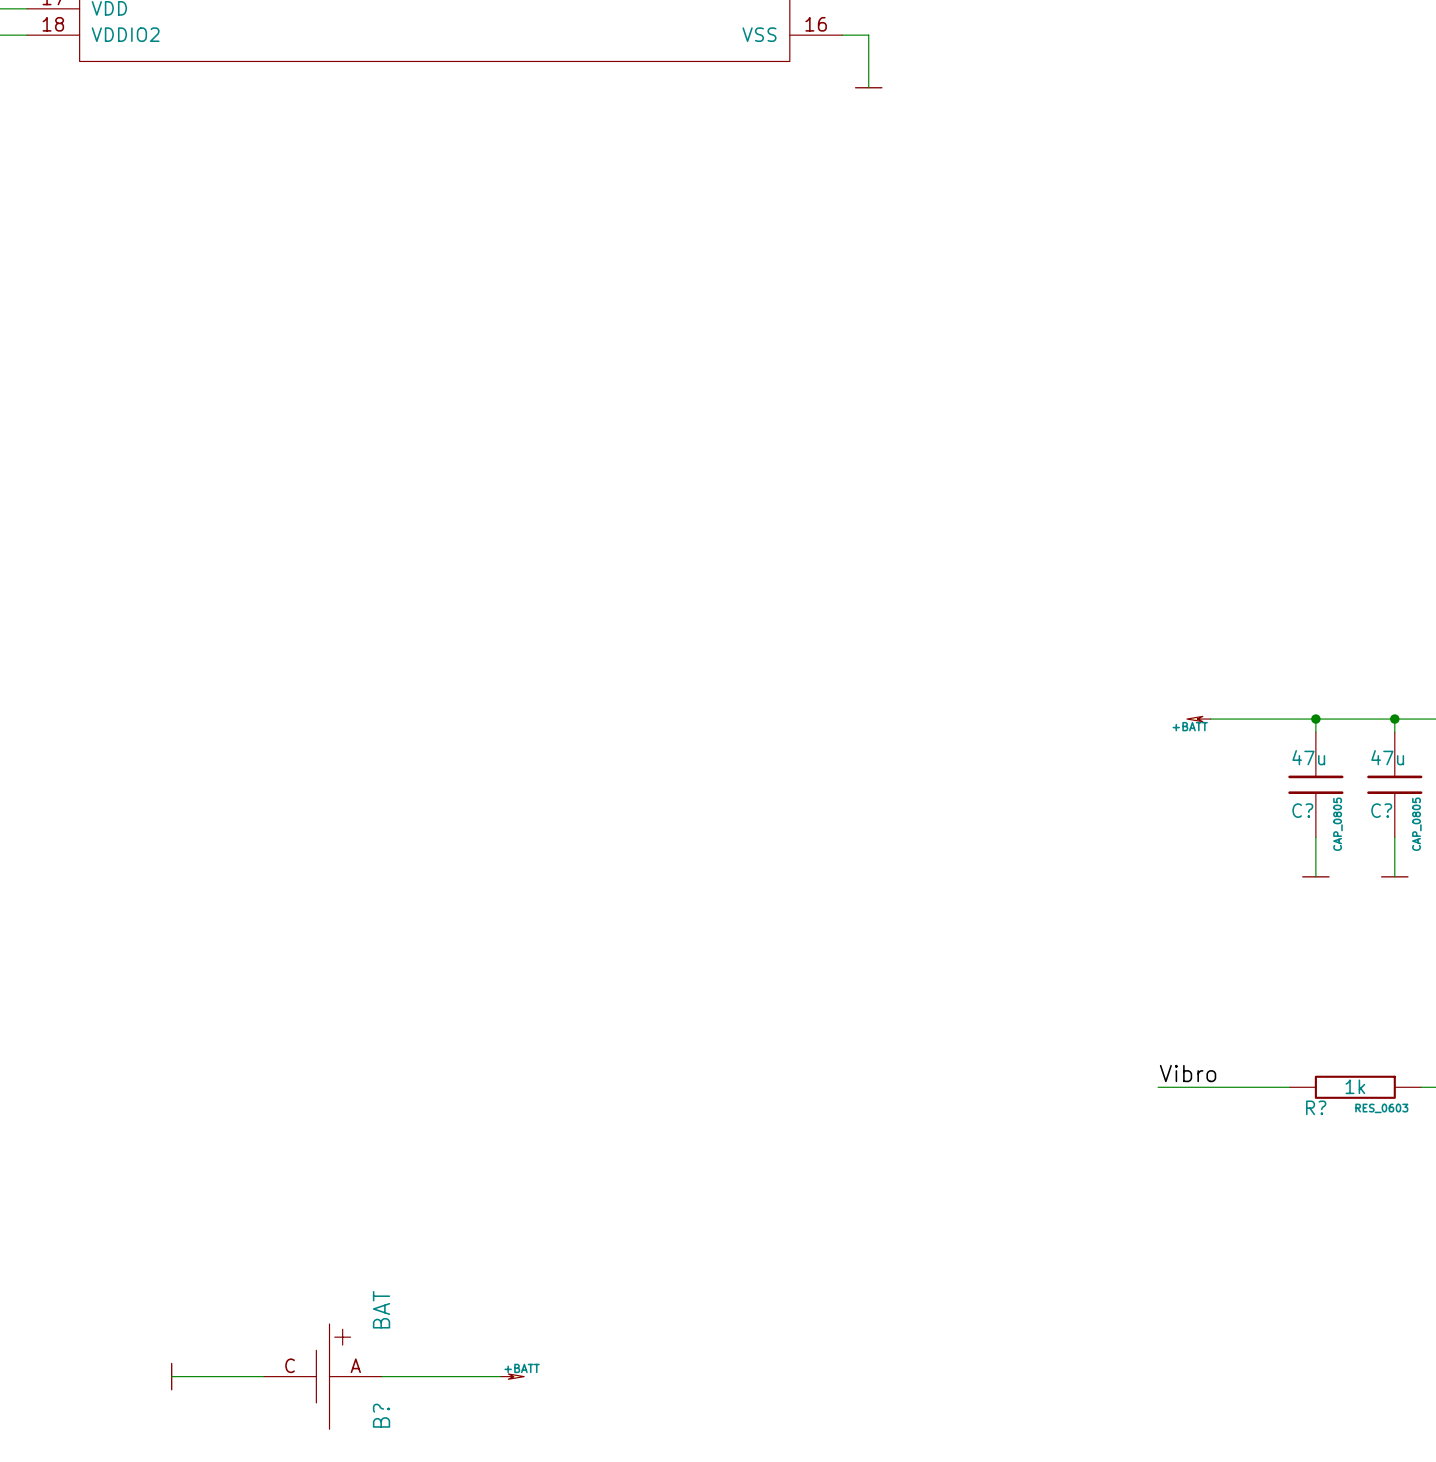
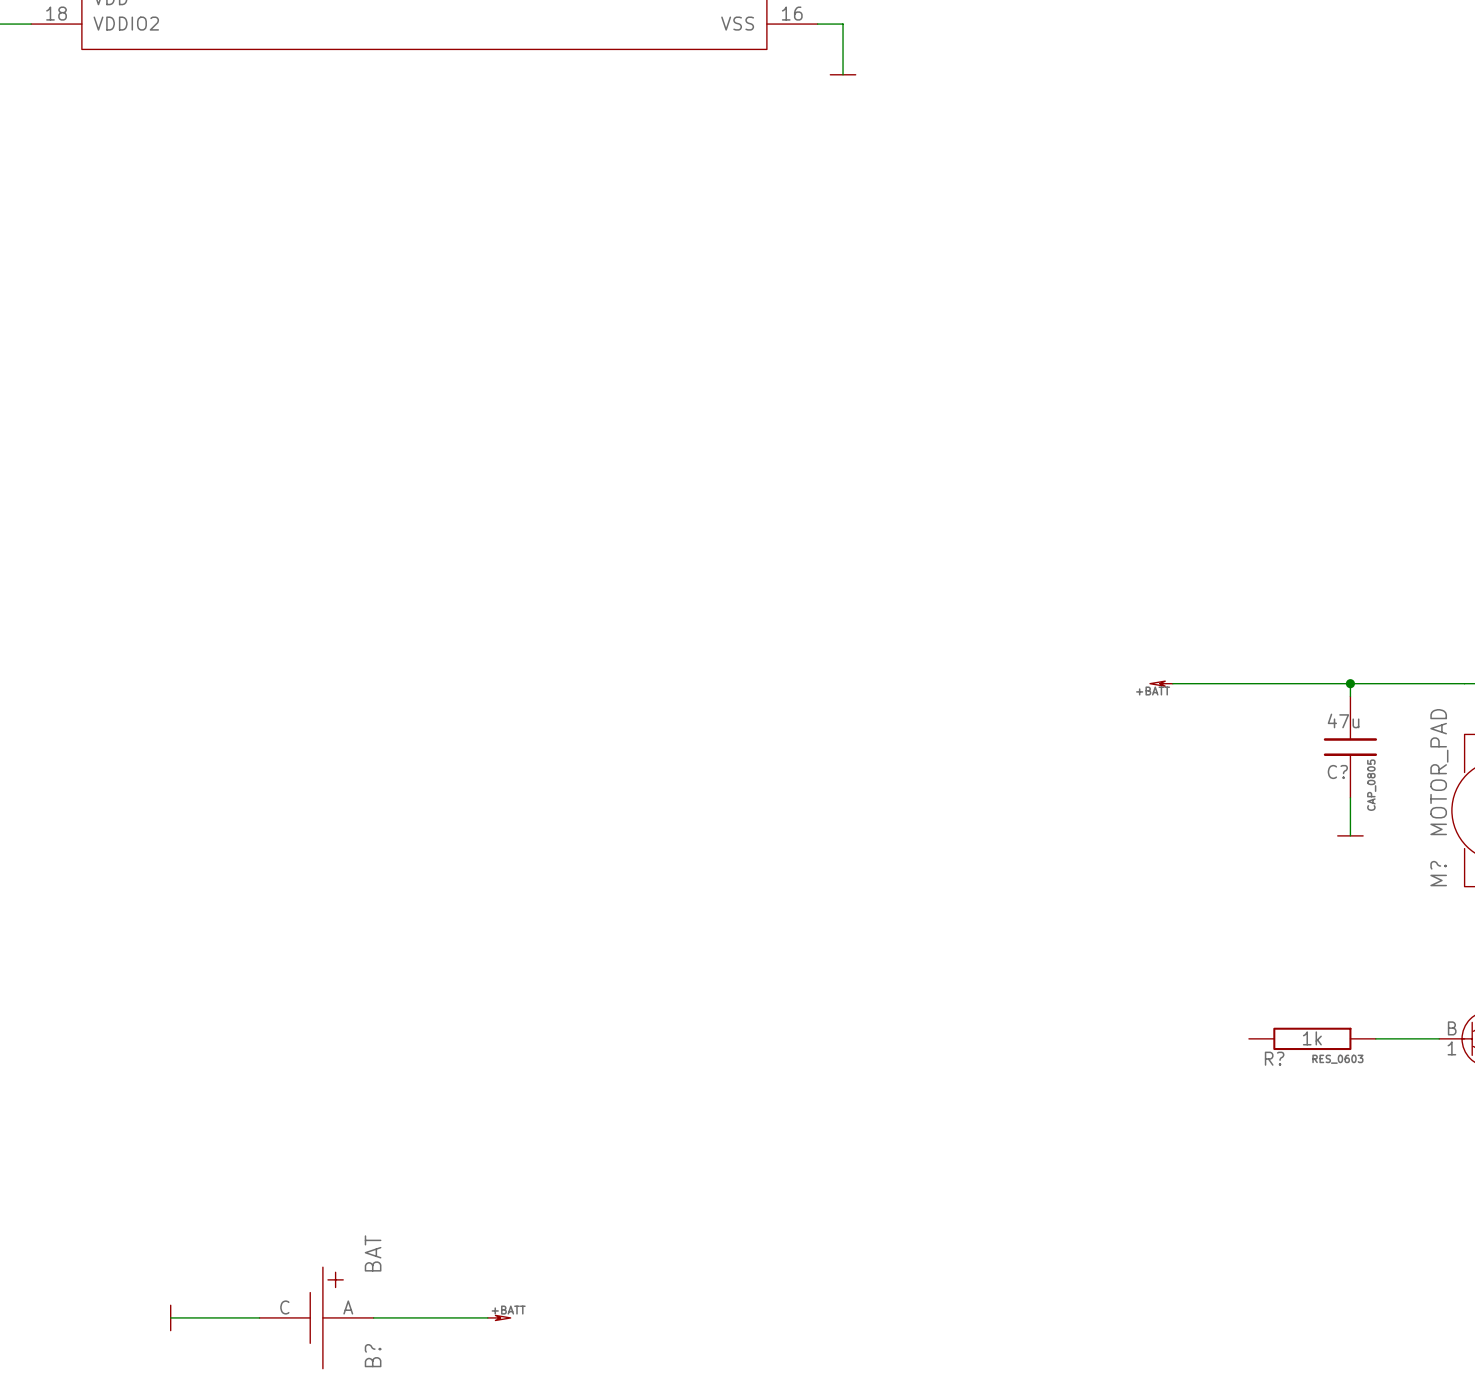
wire: (1315, 719) (1315, 732) -> none
junction: (1315, 719) -> none
C?: 47u (1315, 784) -> none
wire: (1315, 837) (1315, 876) -> none
power symbol: (1315, 876) -> none
label: Vibro (1188, 1073) -> none
wire: (1158, 1087) (1289, 1087) -> none

